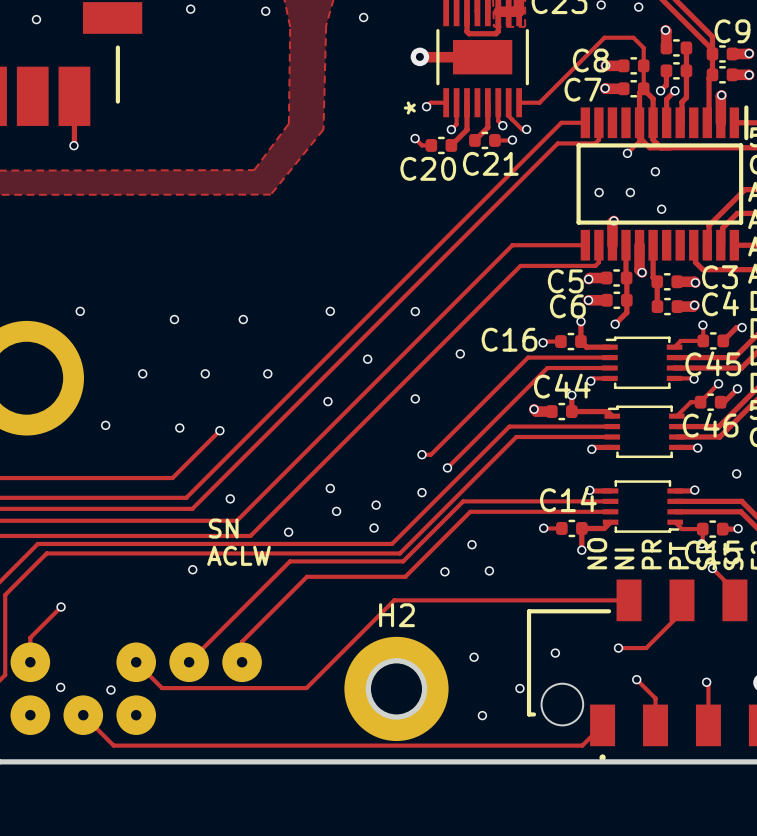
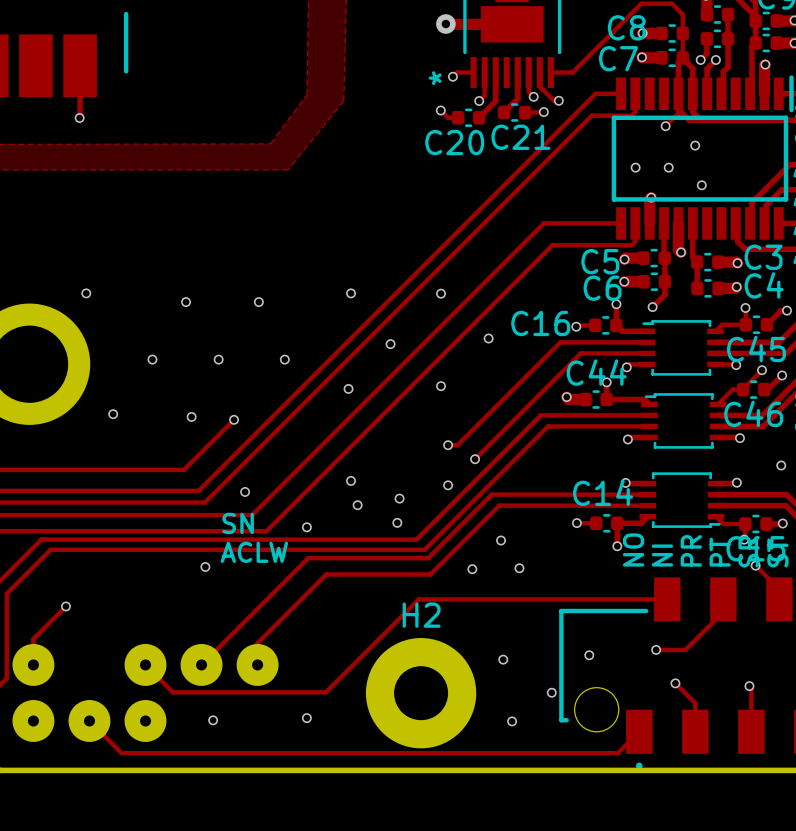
via: (60, 687) -> none
via: (110, 690) -> none
via: none -> (306, 718)
via: none -> (213, 720)

